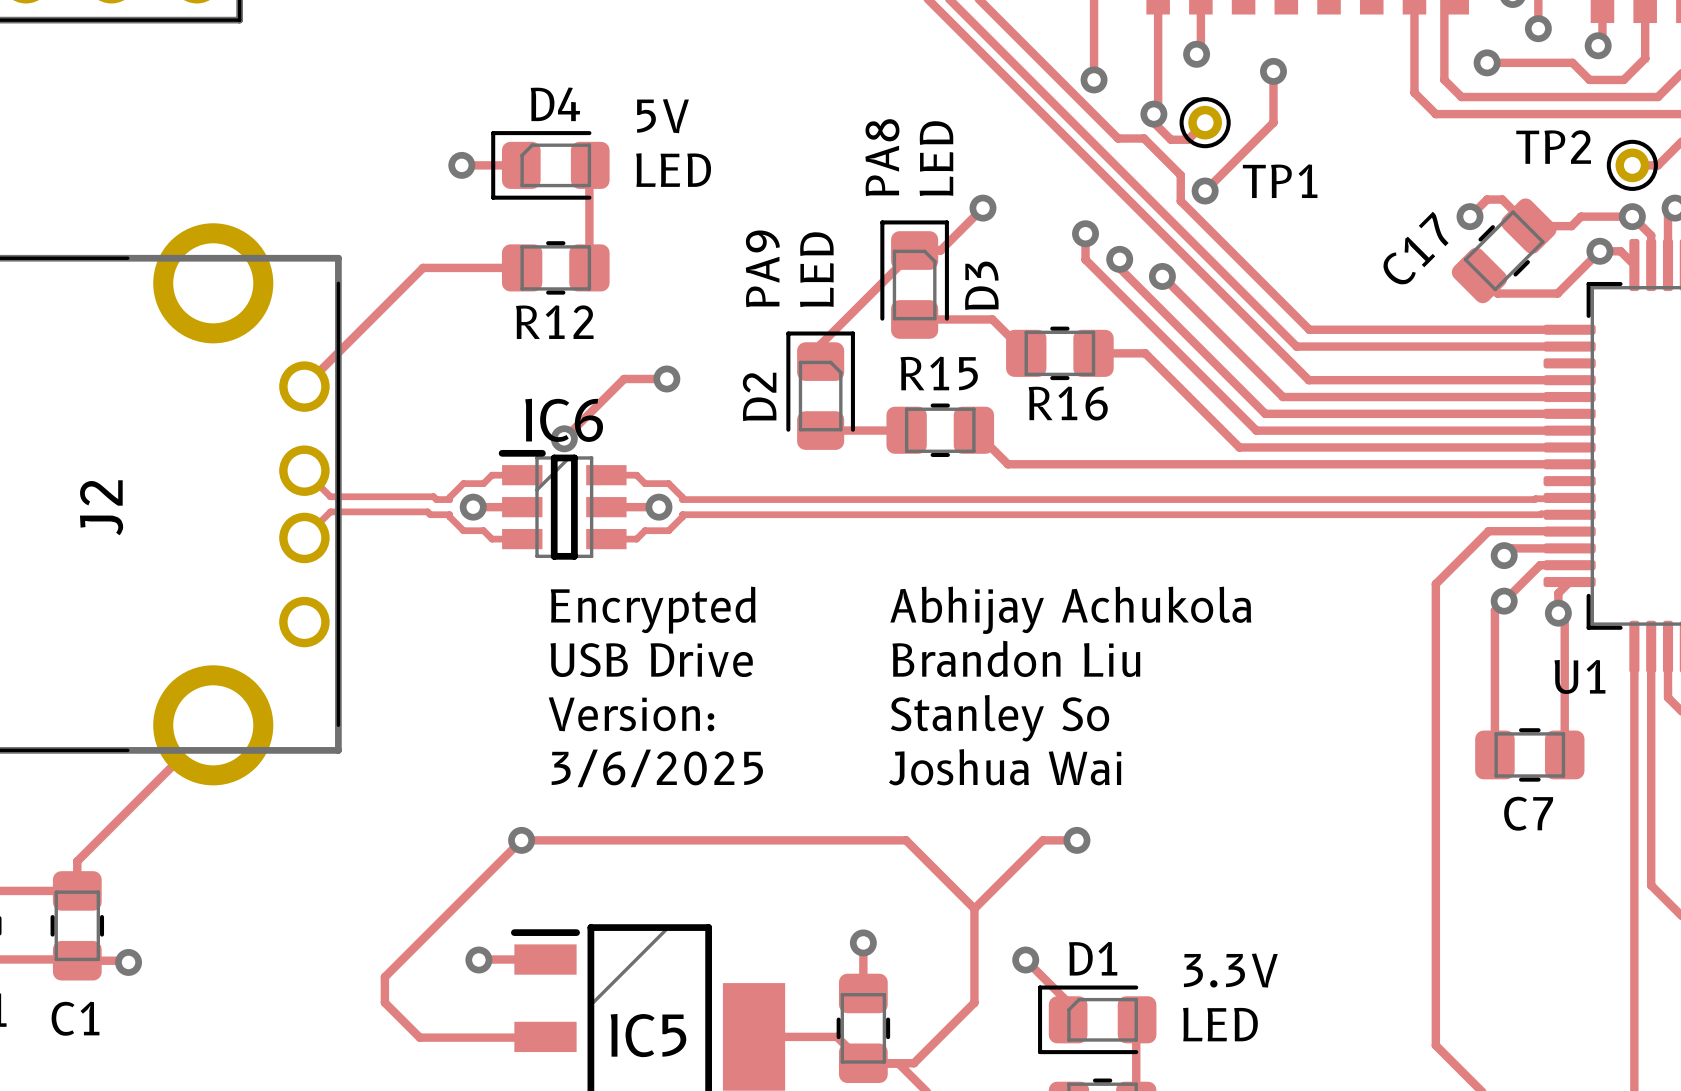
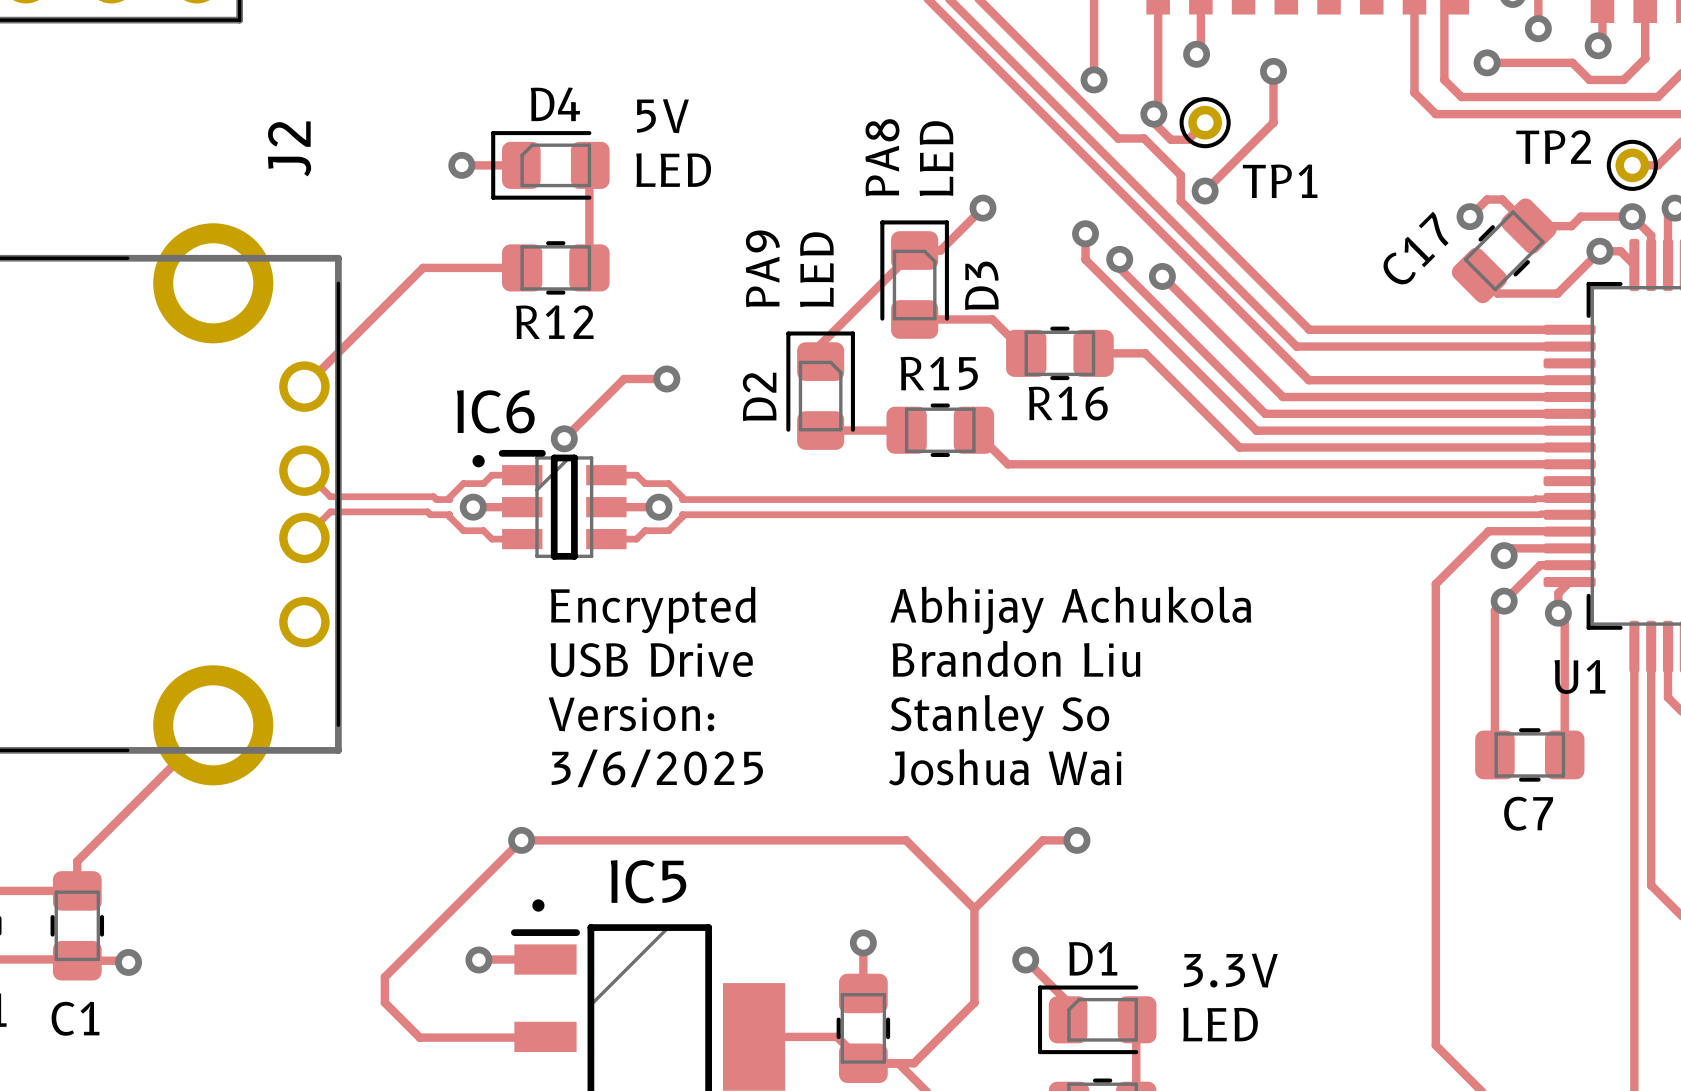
IC6 name position: IC6 (564, 420) -> IC6 (495, 411)
text: none -> . (478, 461)
J2 name position: J2 (101, 507) -> J2 (289, 148)
text: none -> . (538, 905)
IC5 name position: IC5 (648, 1035) -> IC5 (648, 881)

